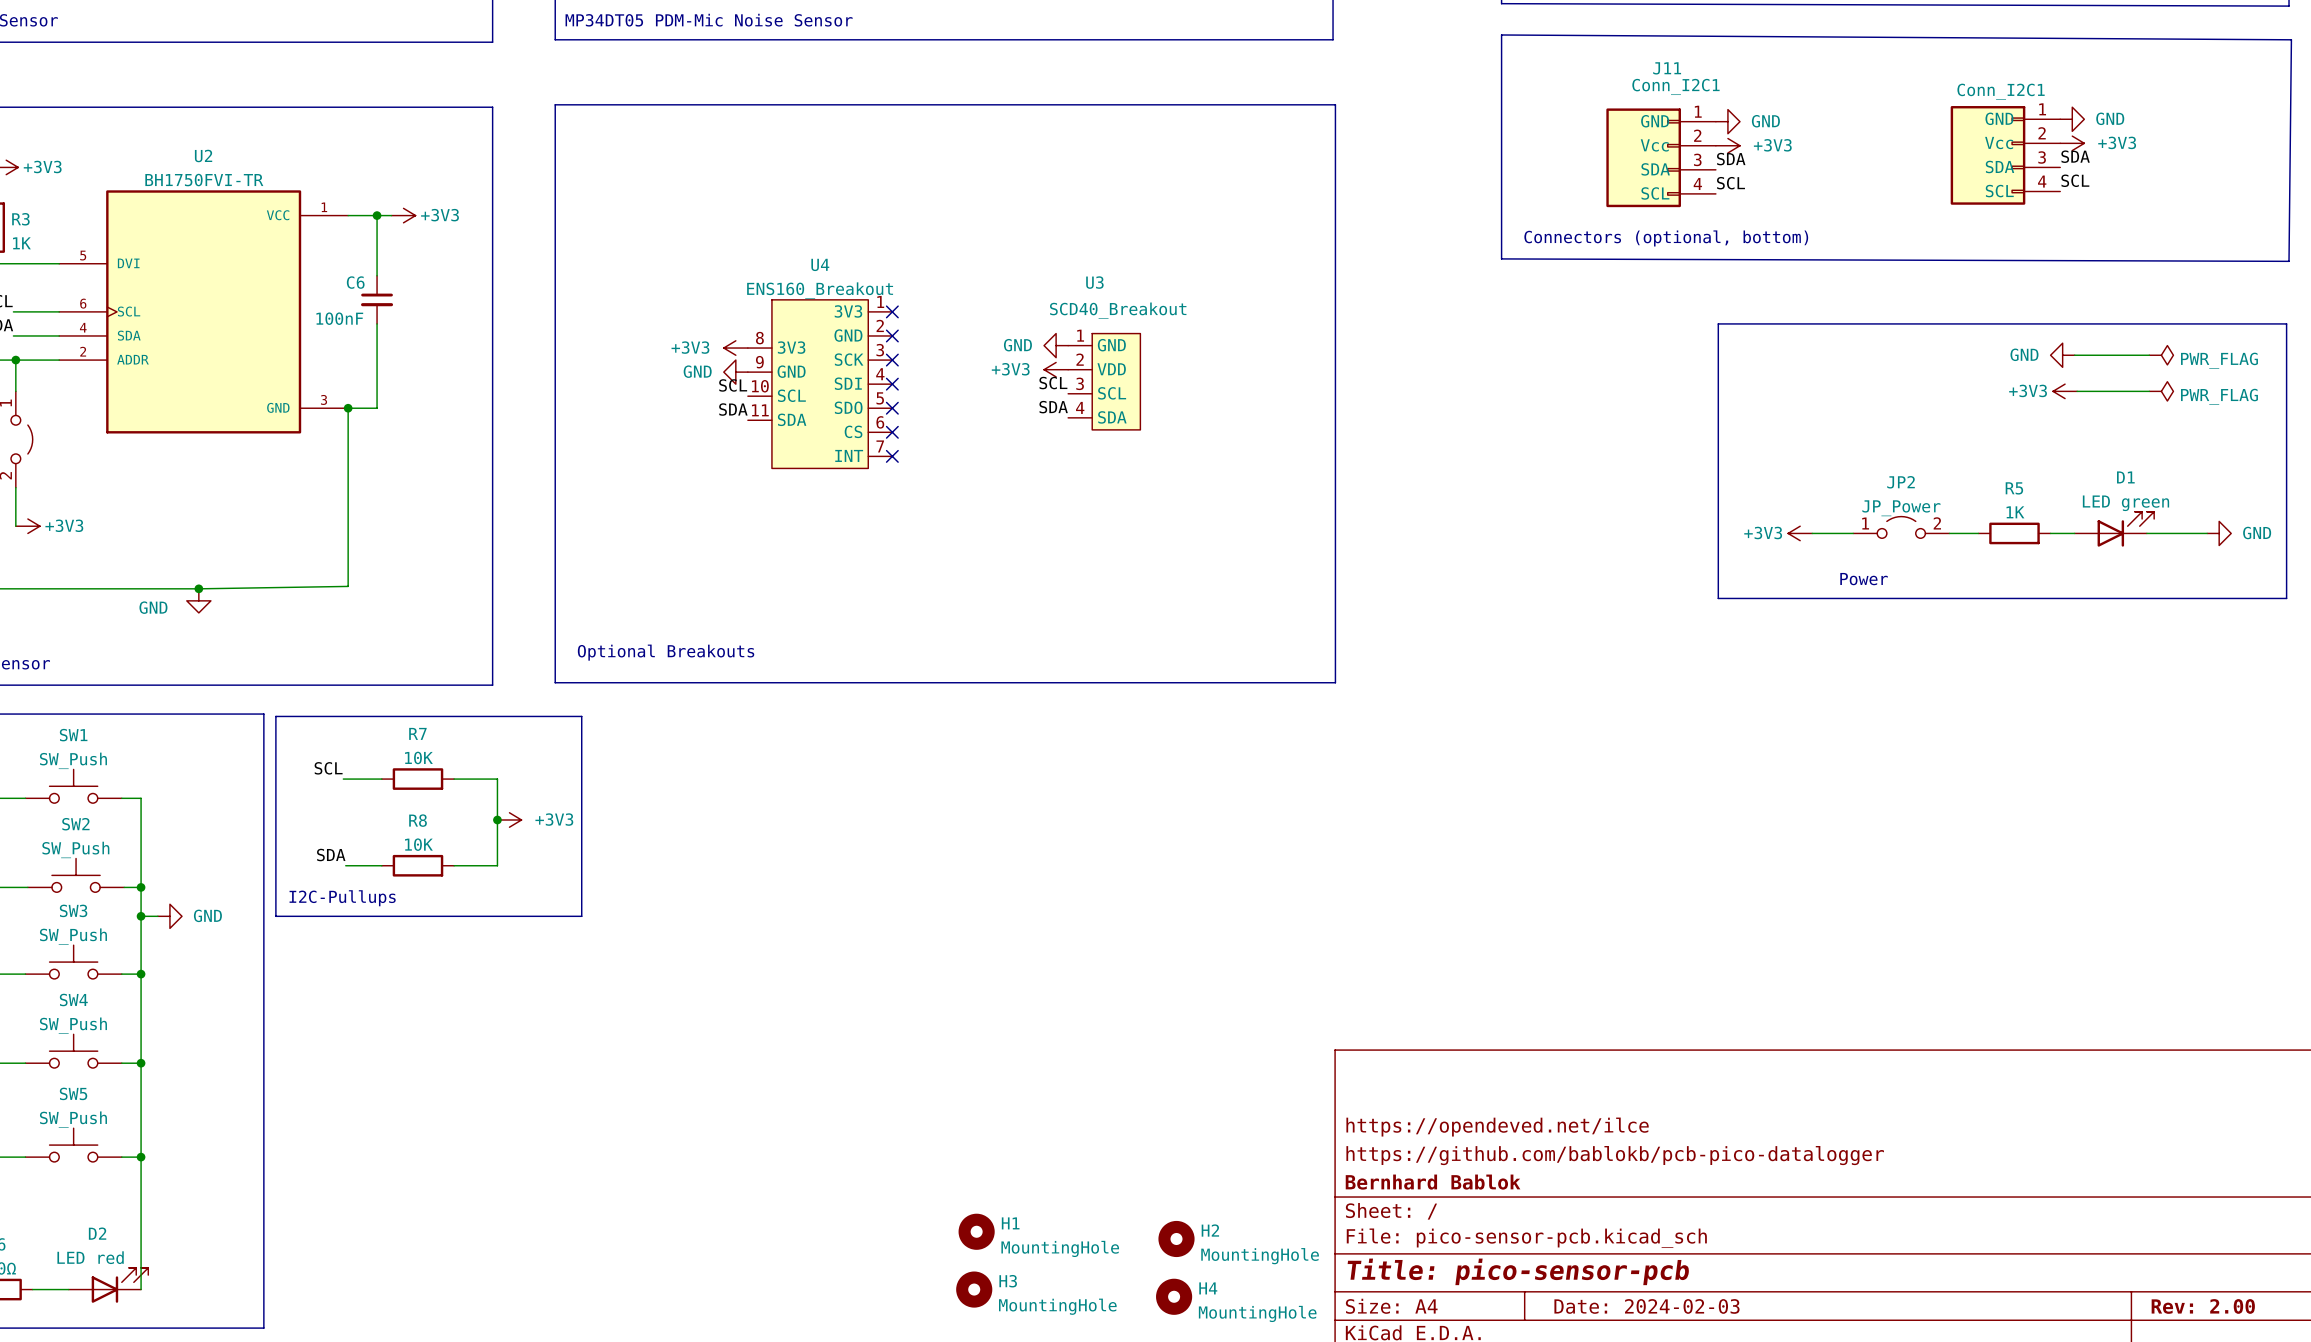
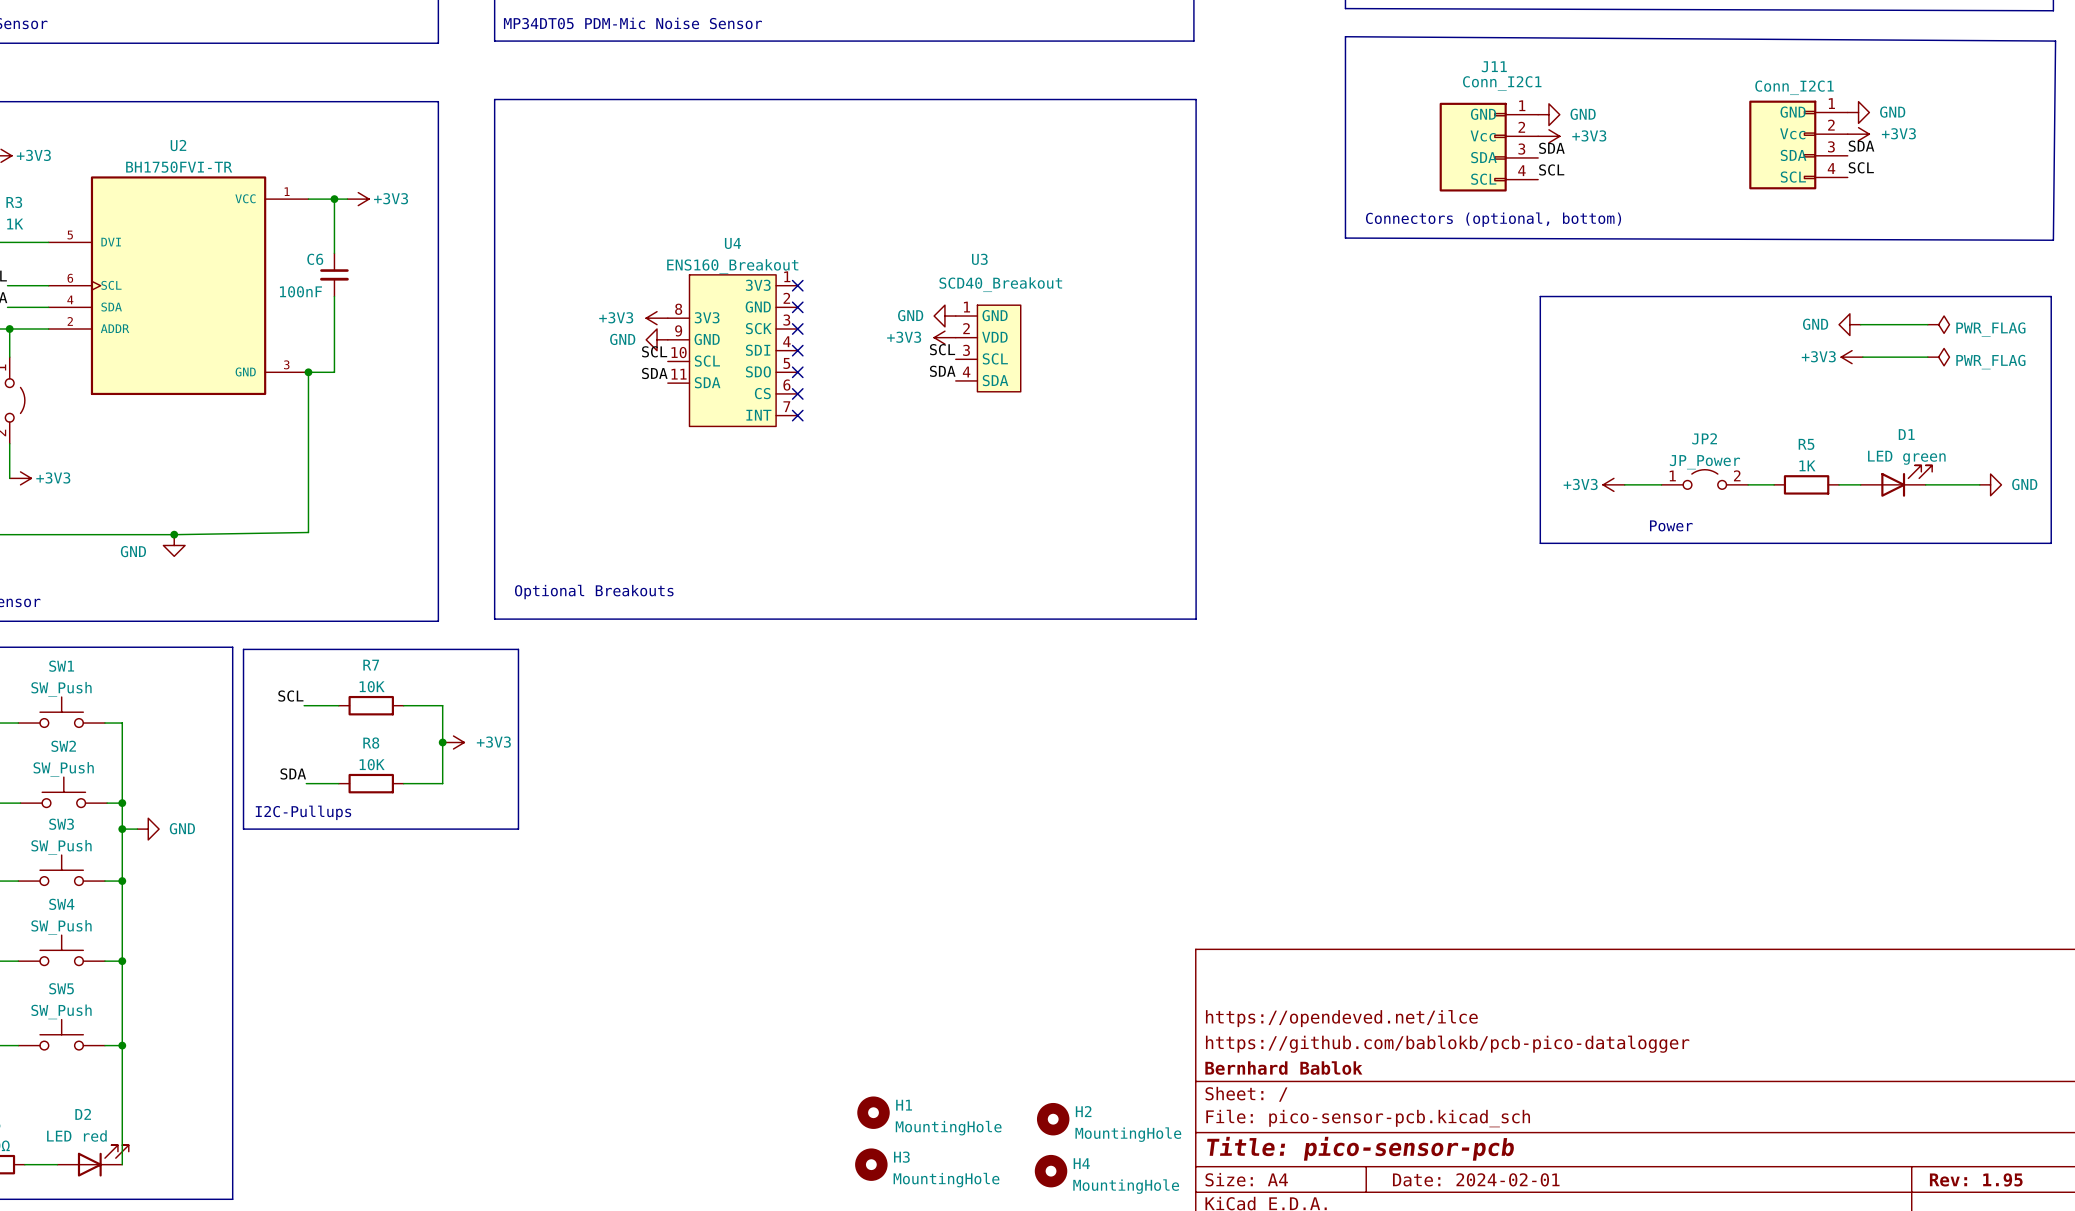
title block: Date: 2024-02-03 (1646, 1306) -> Date: 2024-02-01 (1476, 1179)
title block: Rev: 2.00 (2203, 1306) -> Rev: 1.95 (1976, 1179)

